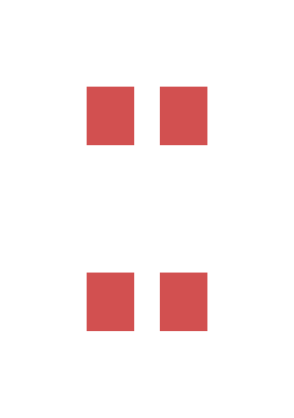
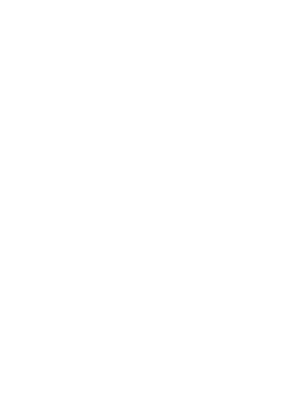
part: (147, 115) -> none
part: (147, 301) -> none

